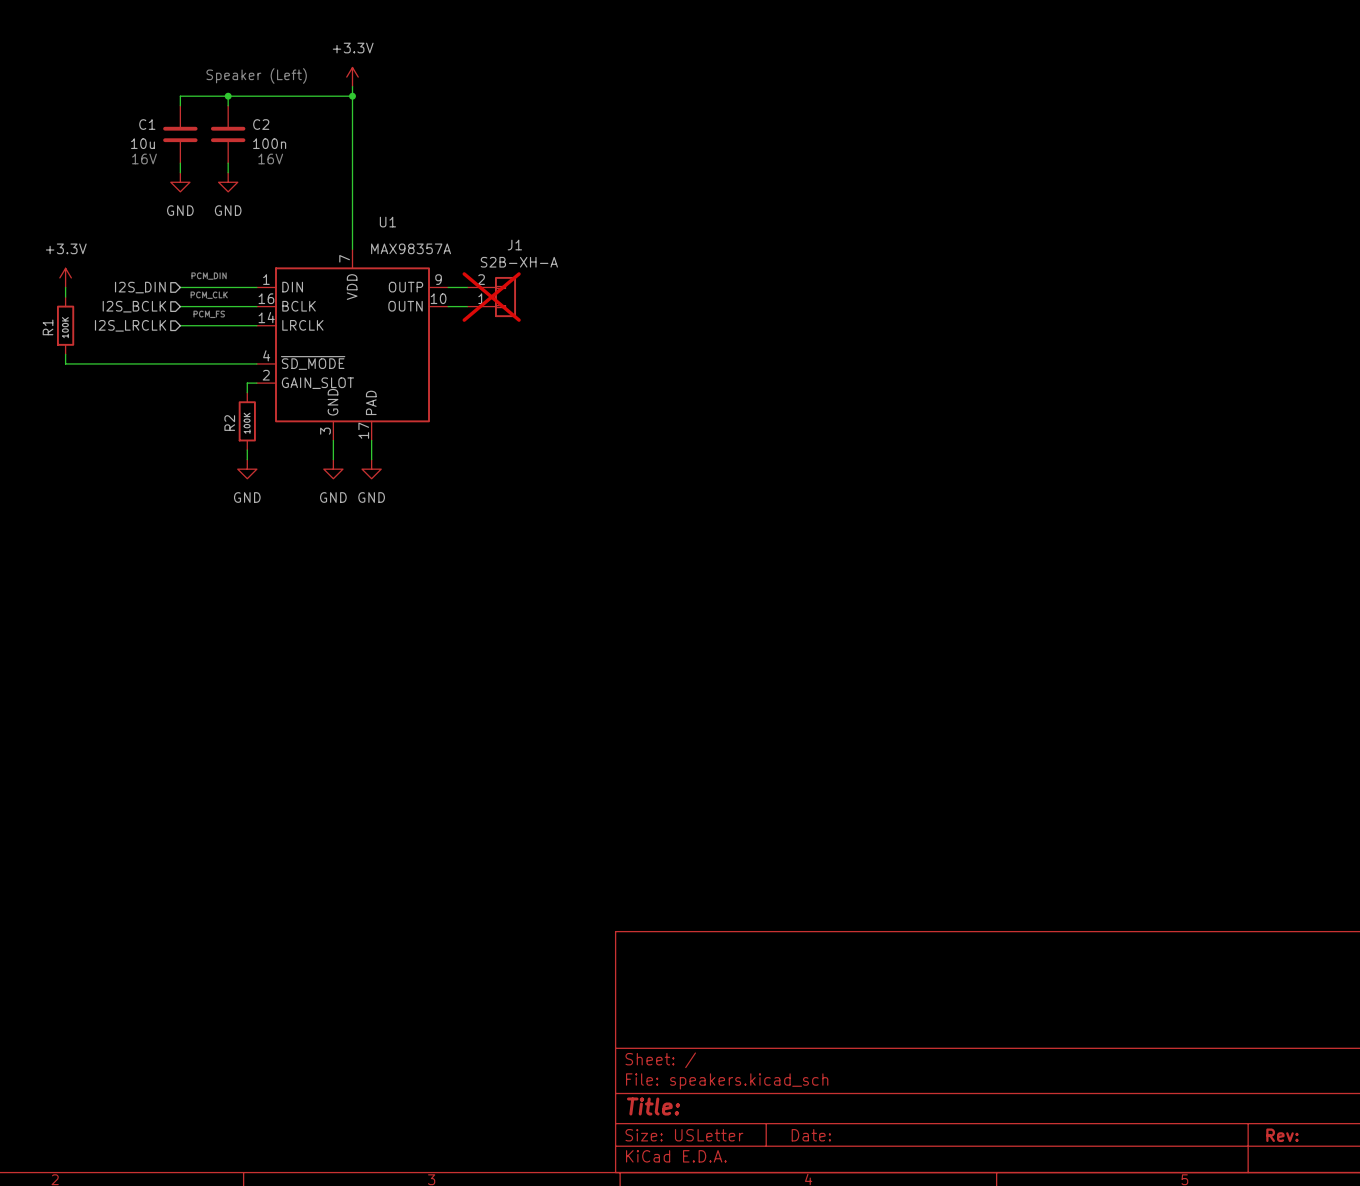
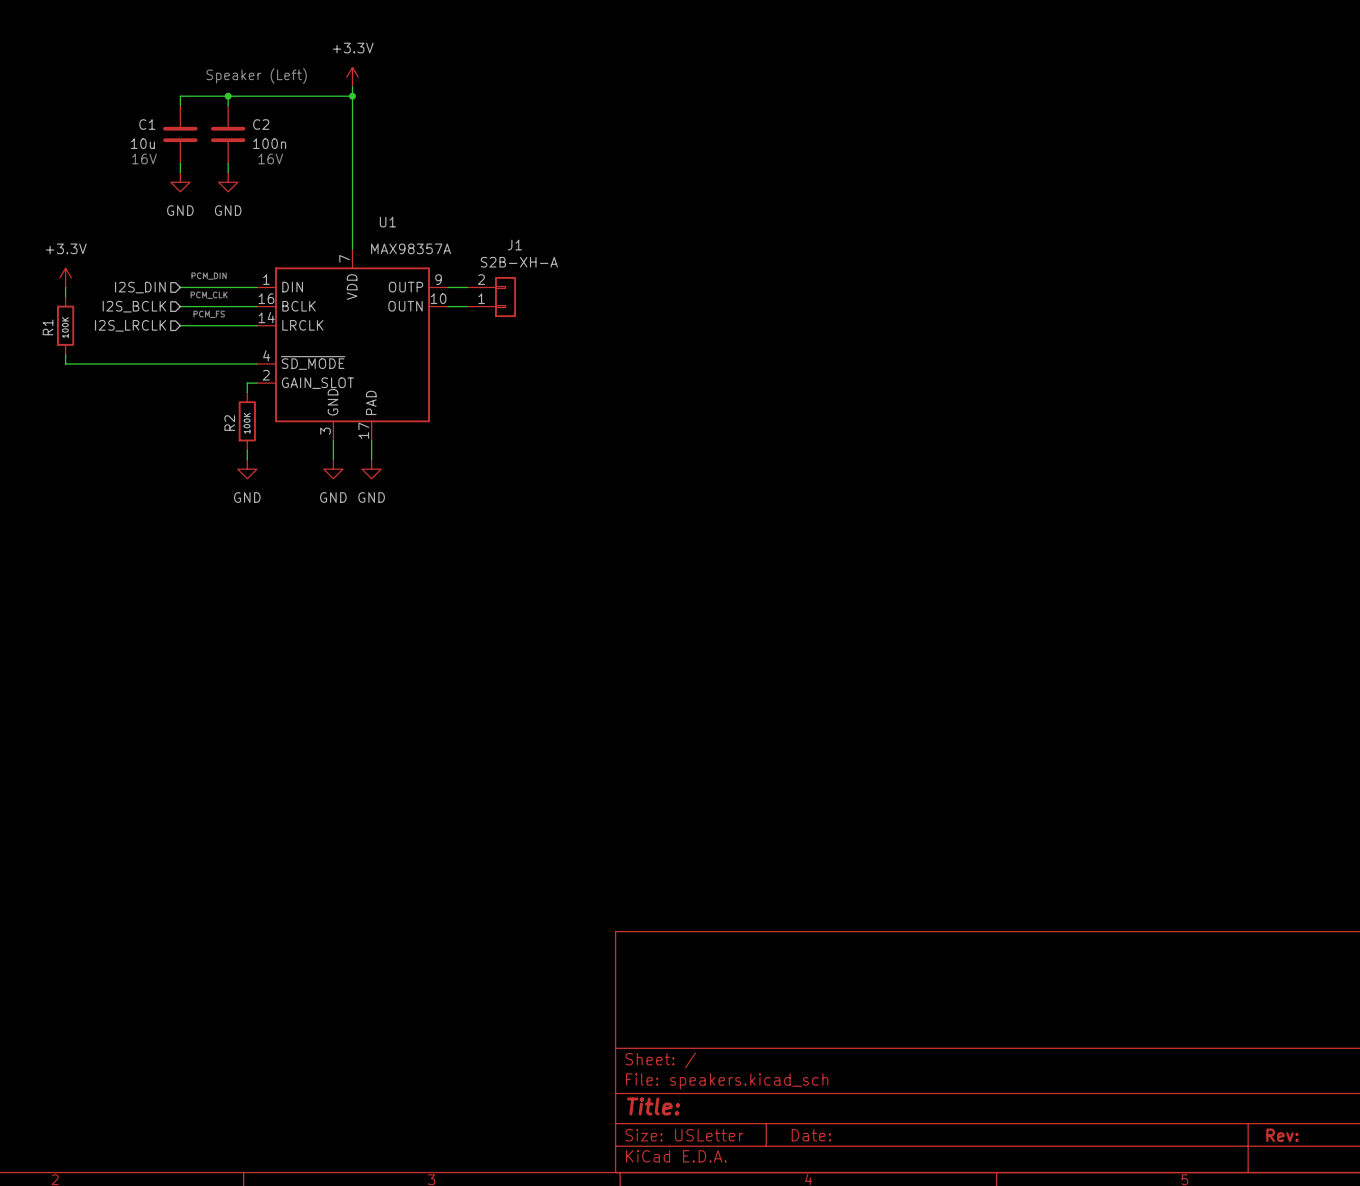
J1 do-not-place cross: (491, 297) -> none

